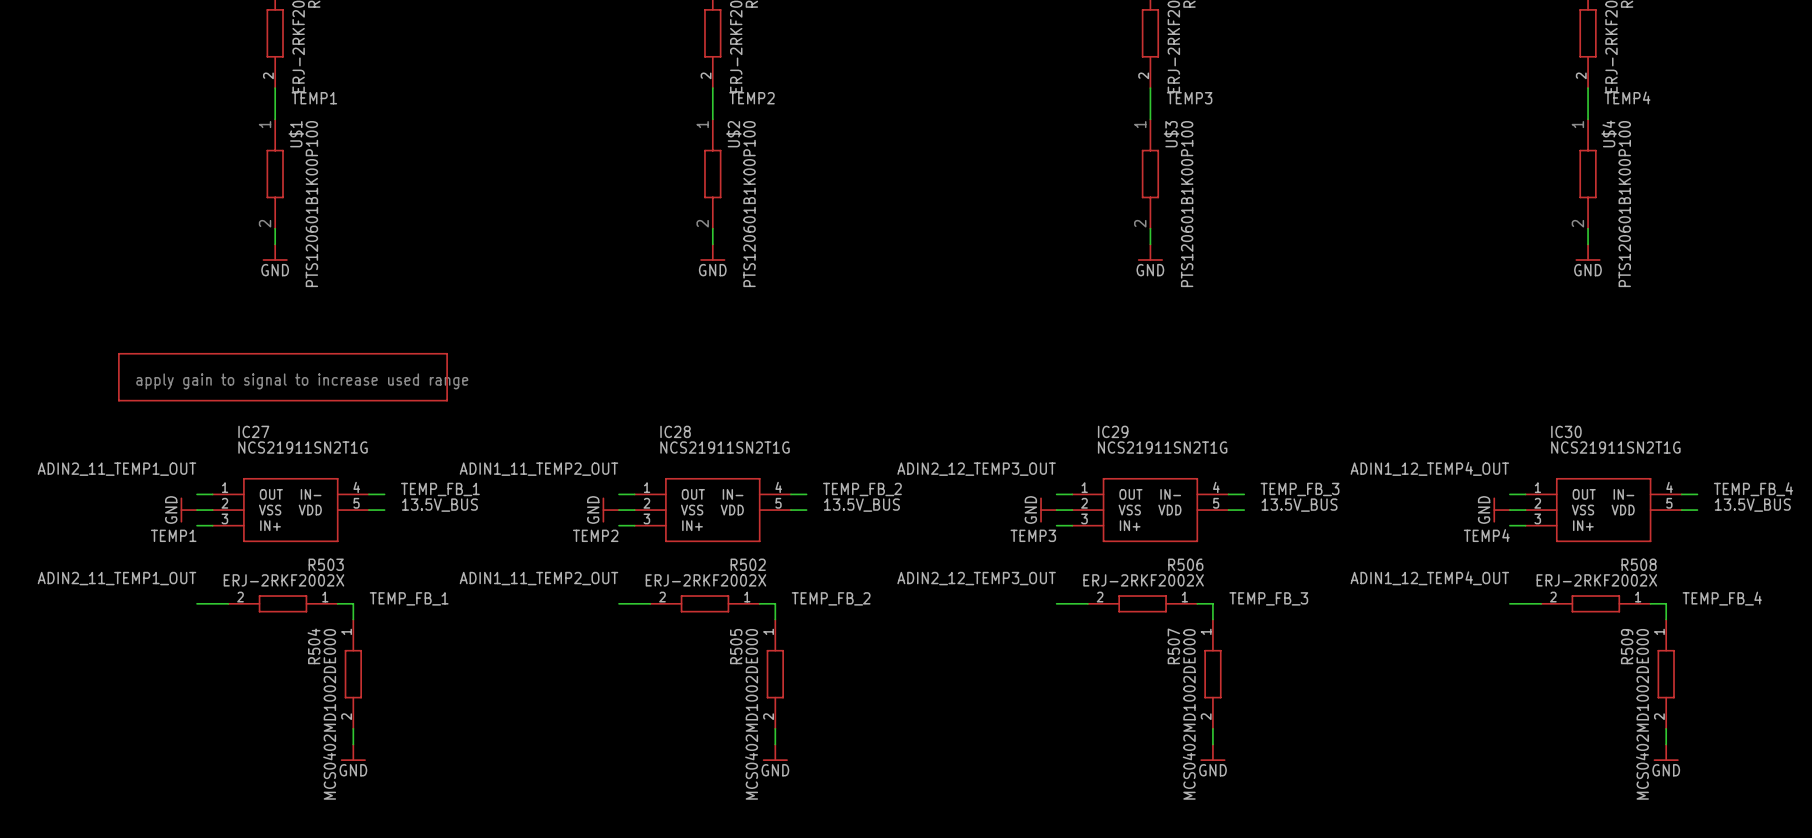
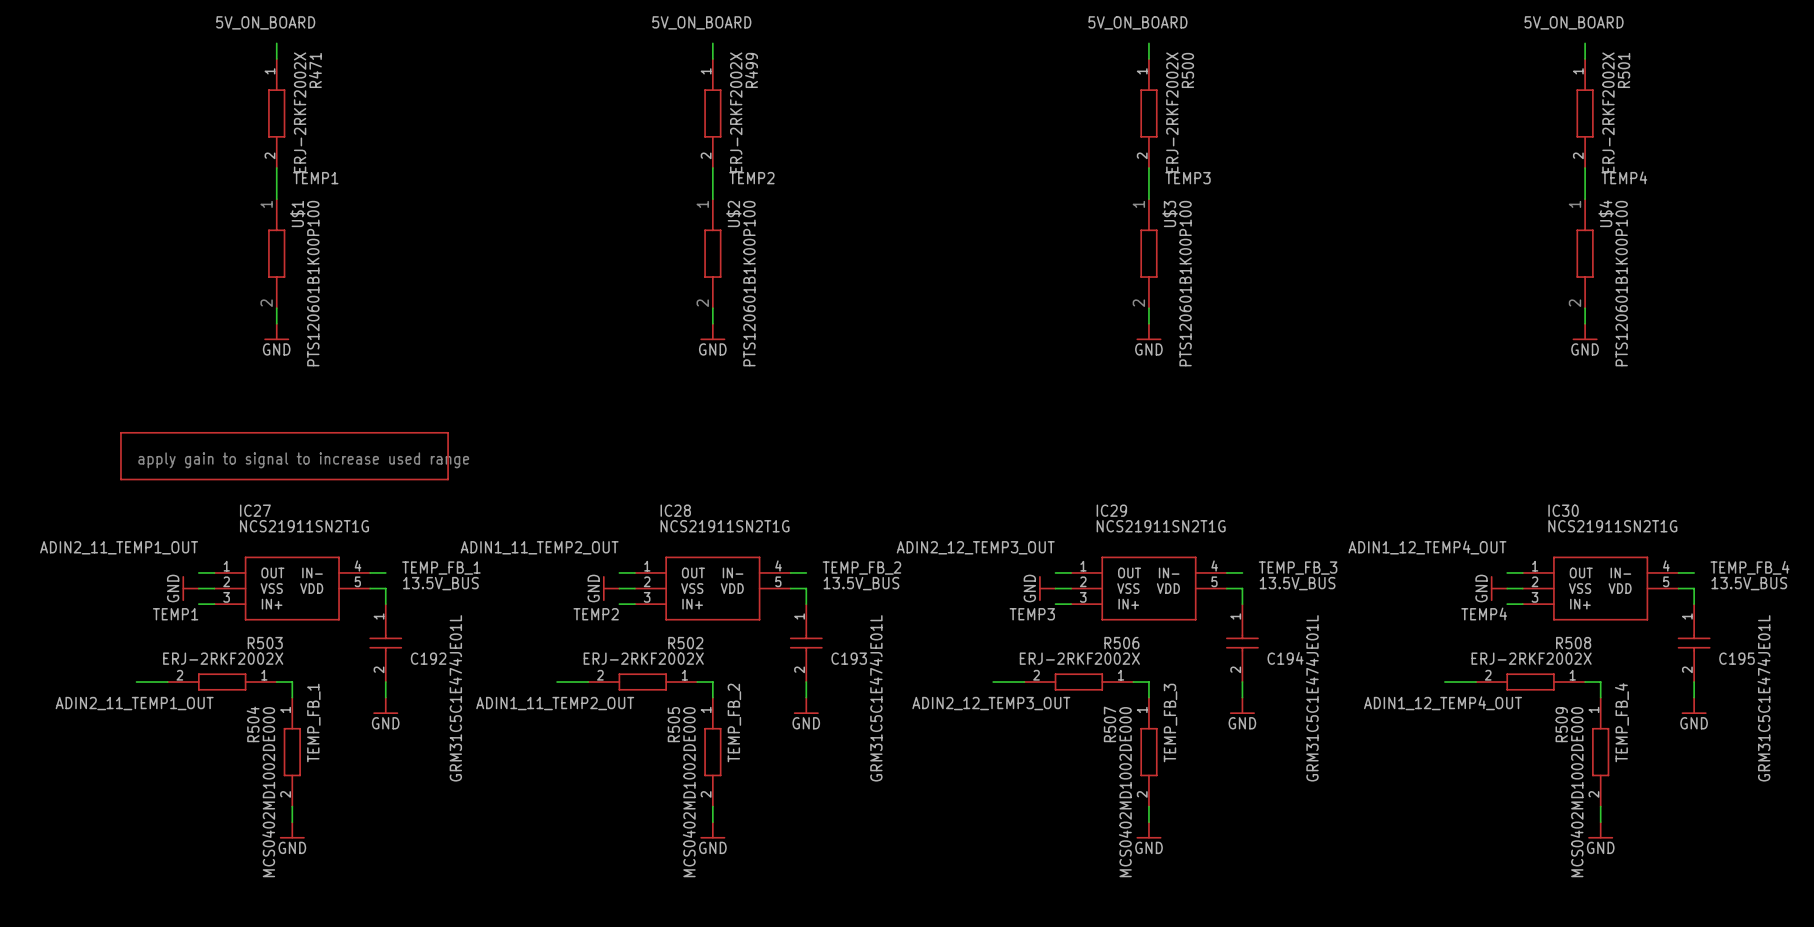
wire: none -> (385, 588) (385, 604)
wire: none -> (806, 588) (806, 604)
wire: none -> (1242, 588) (1242, 604)
wire: none -> (1694, 588) (1694, 604)
C192: none -> GRM31C5C1E474JE01L (385, 643)
C193: none -> GRM31C5C1E474JE01L (806, 643)
C194: none -> GRM31C5C1E474JE01L (1242, 643)
C195: none -> GRM31C5C1E474JE01L (1694, 643)
label position: ADIN2_11_TEMP1_OUT (116, 578) -> ADIN2_11_TEMP1_OUT (134, 703)
label position: ADIN1_11_TEMP2_OUT (538, 578) -> ADIN1_11_TEMP2_OUT (555, 703)
label position: ADIN2_12_TEMP3_OUT (976, 578) -> ADIN2_12_TEMP3_OUT (991, 703)
label position: ADIN1_12_TEMP4_OUT (1429, 578) -> ADIN1_12_TEMP4_OUT (1443, 703)
label rotation: 0° (409, 598) -> 90° counterclockwise (313, 722)
label position: TEMP_FB_1 (409, 598) -> TEMP_FB_1 (313, 722)
label rotation: 0° (831, 598) -> 90° counterclockwise (734, 722)
label position: TEMP_FB_2 (831, 598) -> TEMP_FB_2 (734, 722)
label rotation: 0° (1268, 598) -> 90° counterclockwise (1170, 722)
label position: TEMP_FB_3 (1268, 598) -> TEMP_FB_3 (1170, 722)
label rotation: 0° (1722, 598) -> 90° counterclockwise (1621, 722)
label position: TEMP_FB_4 (1722, 598) -> TEMP_FB_4 (1621, 722)
wire: (197, 603) (228, 603) -> (136, 682) (167, 682)
R503 position: (283, 603) -> (222, 682)
wire: (337, 603) (353, 603) (353, 619) -> (276, 682) (292, 682) (292, 697)
wire: none -> (385, 682) (385, 697)
wire: (619, 603) (650, 603) -> (557, 682) (588, 682)
R502 position: (704, 603) -> (642, 682)
wire: (759, 603) (775, 603) (775, 619) -> (697, 682) (712, 682) (712, 697)
wire: none -> (806, 682) (806, 697)
wire: (1056, 603) (1087, 603) -> (993, 682) (1024, 682)
R506 position: (1142, 603) -> (1078, 682)
wire: (1197, 603) (1212, 603) (1212, 619) -> (1133, 682) (1148, 682) (1148, 697)
wire: none -> (1242, 682) (1242, 697)
wire: (1509, 603) (1541, 603) -> (1444, 682) (1476, 682)
R508 position: (1595, 603) -> (1530, 682)
wire: (1650, 603) (1666, 603) (1666, 619) -> (1585, 682) (1600, 682) (1600, 697)
wire: none -> (1694, 682) (1694, 697)
power symbol: none -> GND (385, 705)
power symbol: none -> GND (806, 705)
power symbol: none -> GND (1242, 705)
power symbol: none -> GND (1694, 705)
R504 position: (353, 674) -> (292, 752)
R505 position: (775, 674) -> (712, 752)
R507 position: (1212, 674) -> (1148, 752)
R509 position: (1666, 674) -> (1600, 752)
wire: (353, 728) (353, 744) -> (292, 806) (292, 822)
wire: (775, 728) (775, 744) -> (712, 806) (712, 822)
wire: (1212, 728) (1212, 744) -> (1148, 806) (1148, 822)
wire: (1666, 728) (1666, 744) -> (1600, 806) (1600, 822)
power symbol position: GND (353, 752) -> GND (292, 830)
power symbol position: GND (775, 752) -> GND (712, 830)
power symbol position: GND (1212, 752) -> GND (1148, 830)
power symbol position: GND (1666, 752) -> GND (1600, 830)

